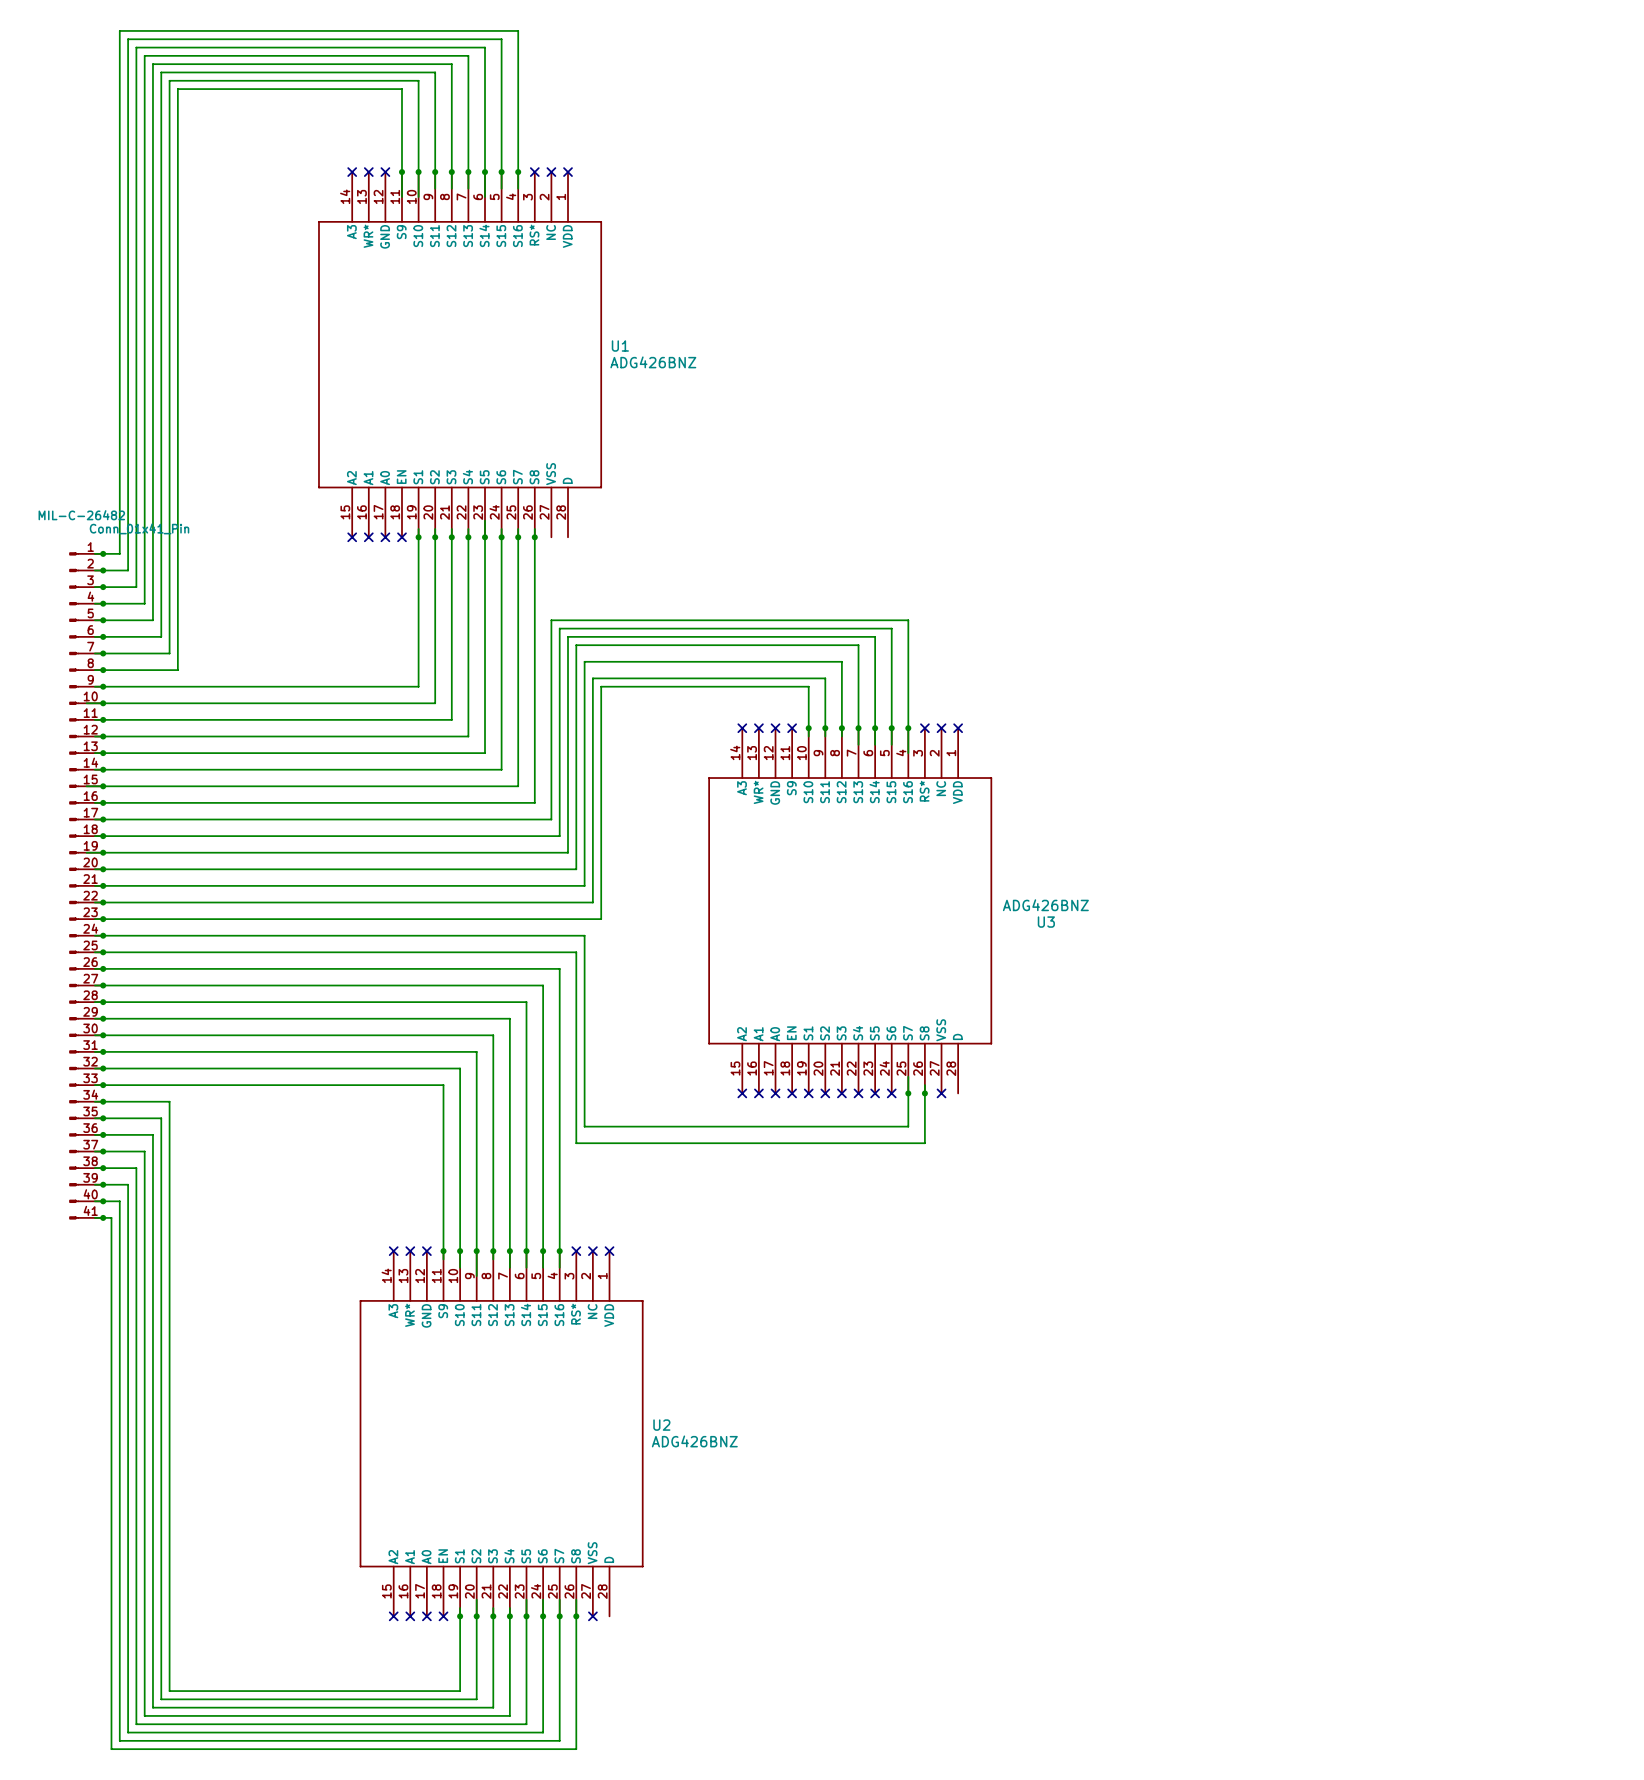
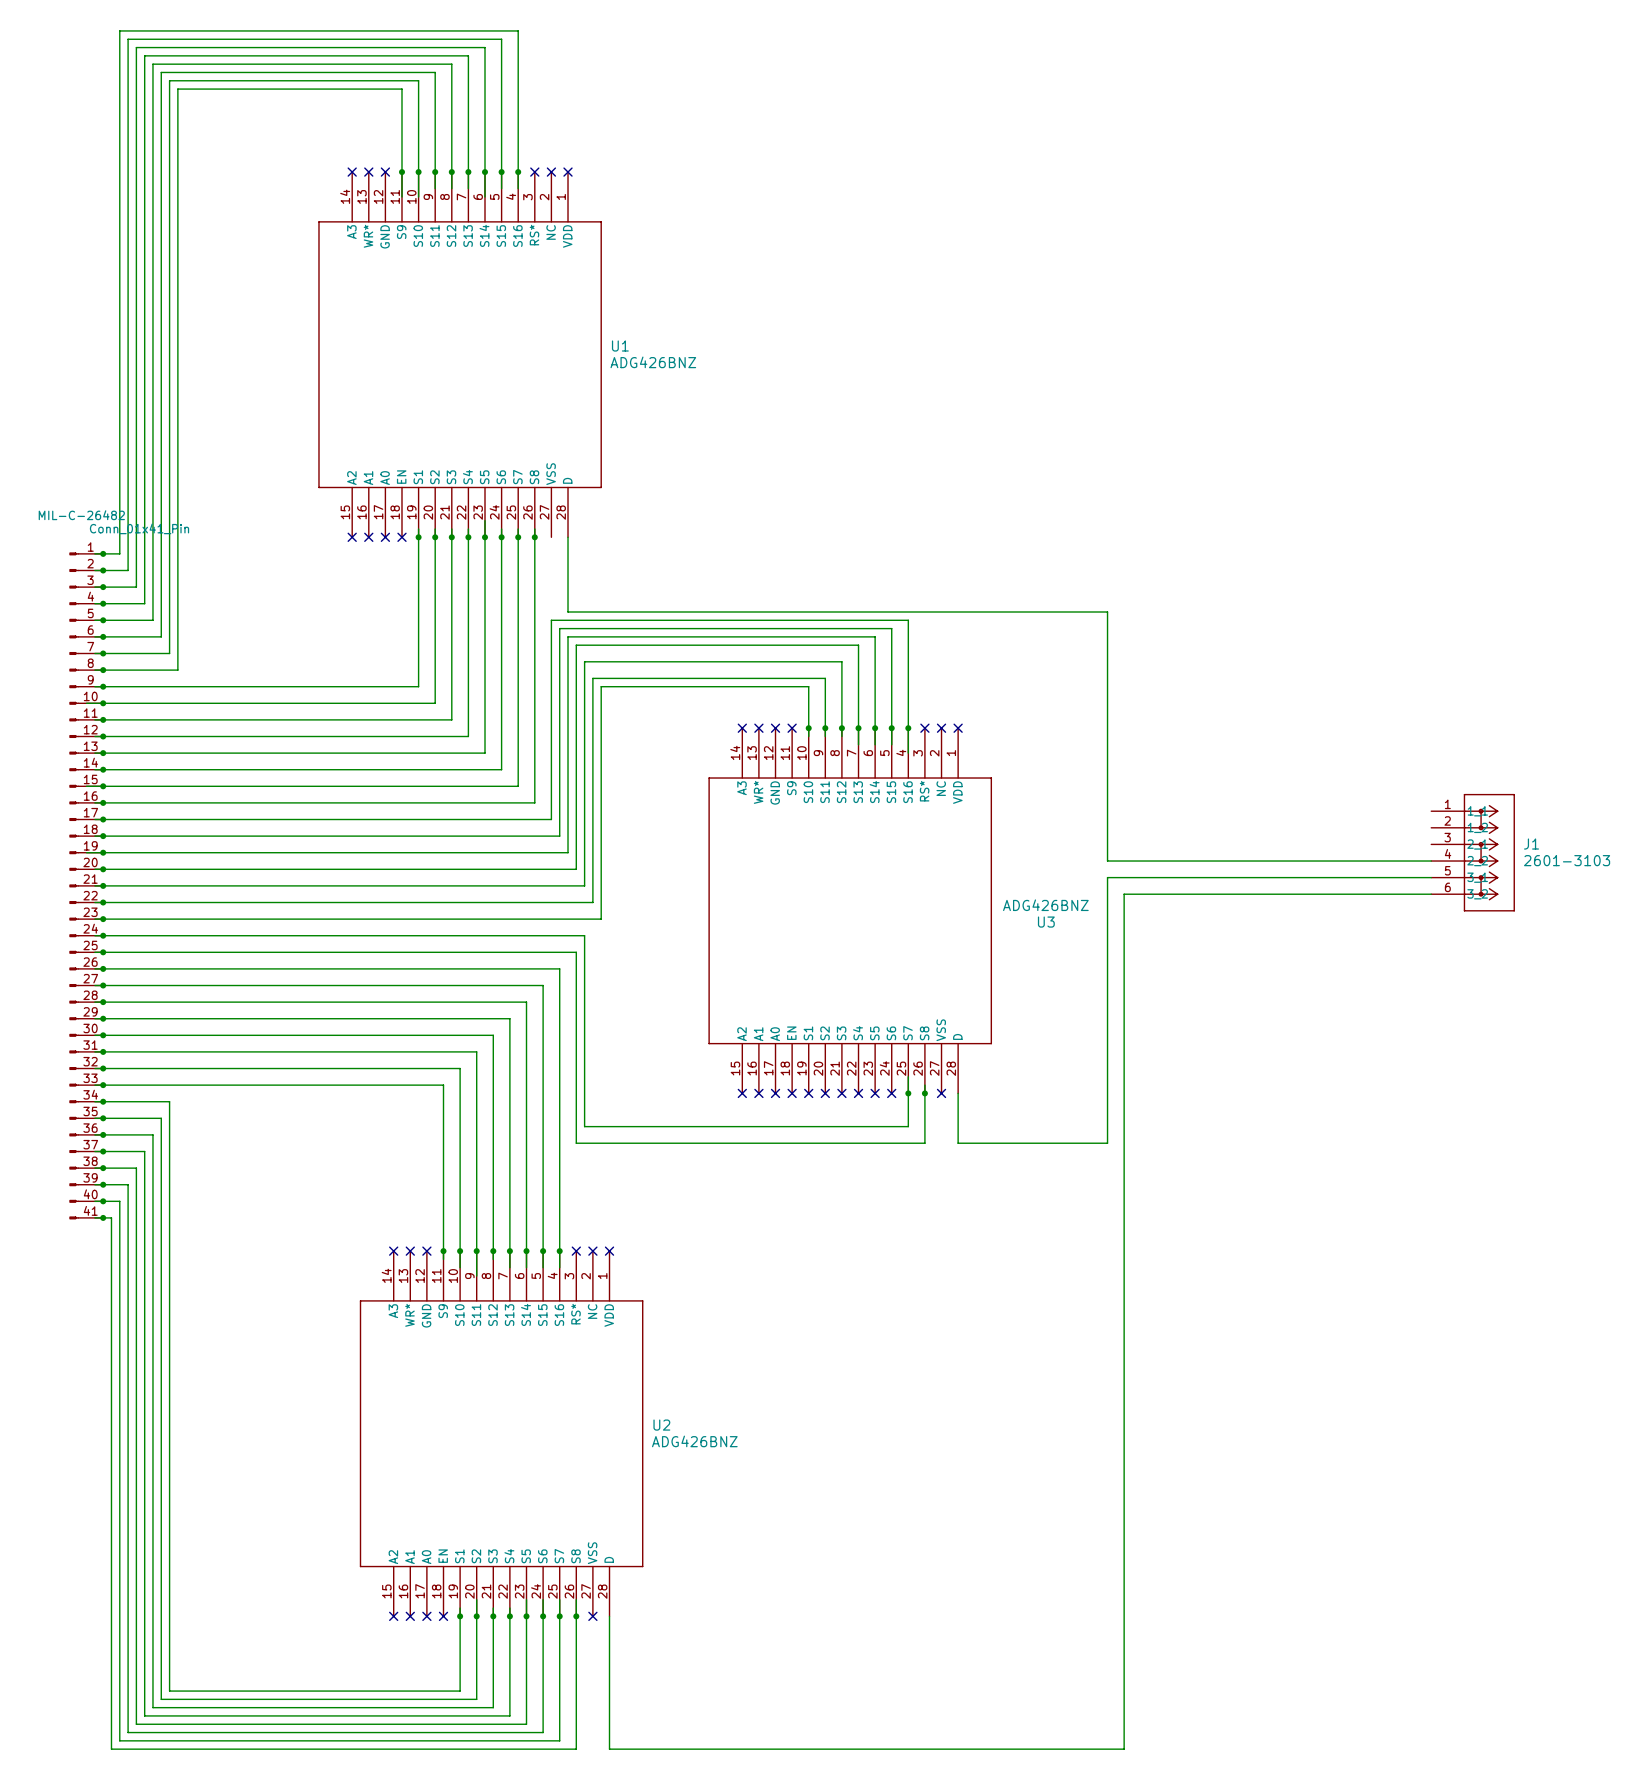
wire: none -> (568, 537) (568, 611) (1107, 611) (1107, 861) (1431, 861)
J1: none -> 2601-3103 (1472, 852)
wire: none -> (1431, 877) (1107, 877) (1107, 1143) (958, 1143) (958, 1093)
wire: none -> (1431, 894) (1124, 894) (1124, 1749) (609, 1749) (609, 1616)

